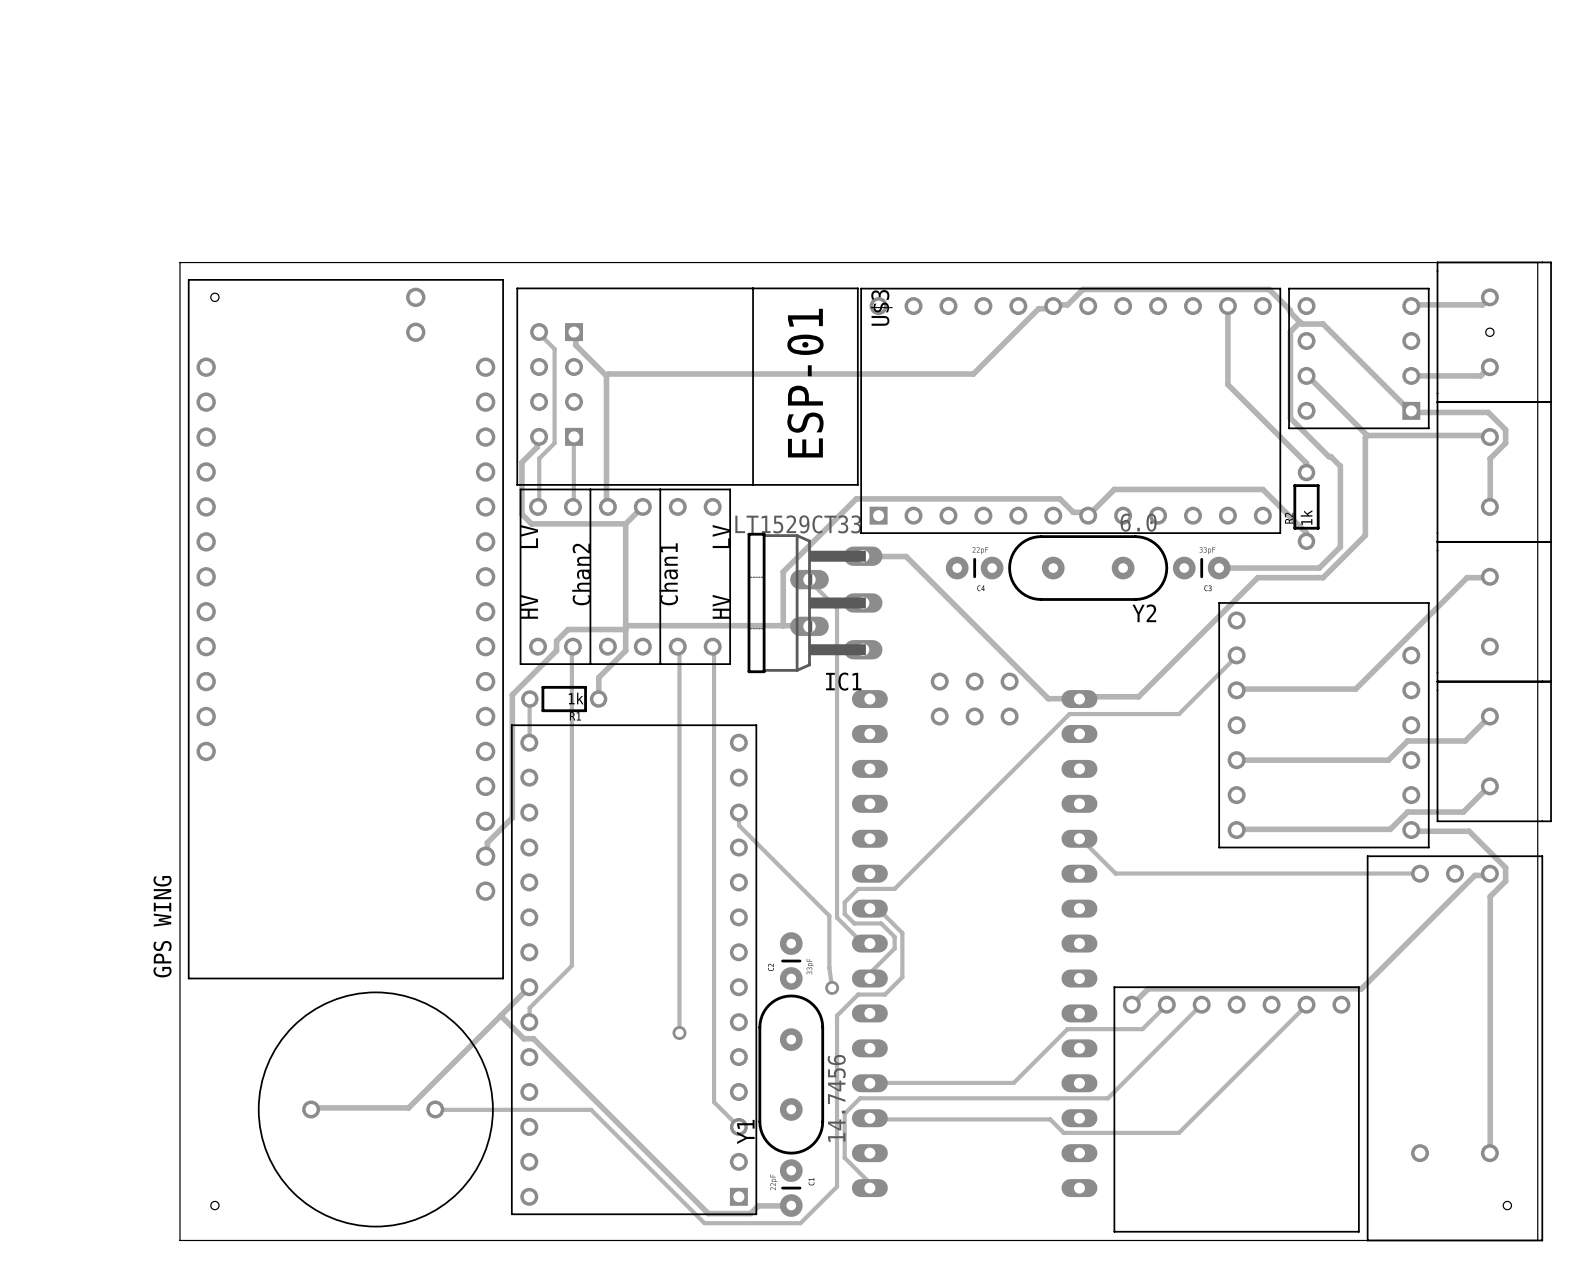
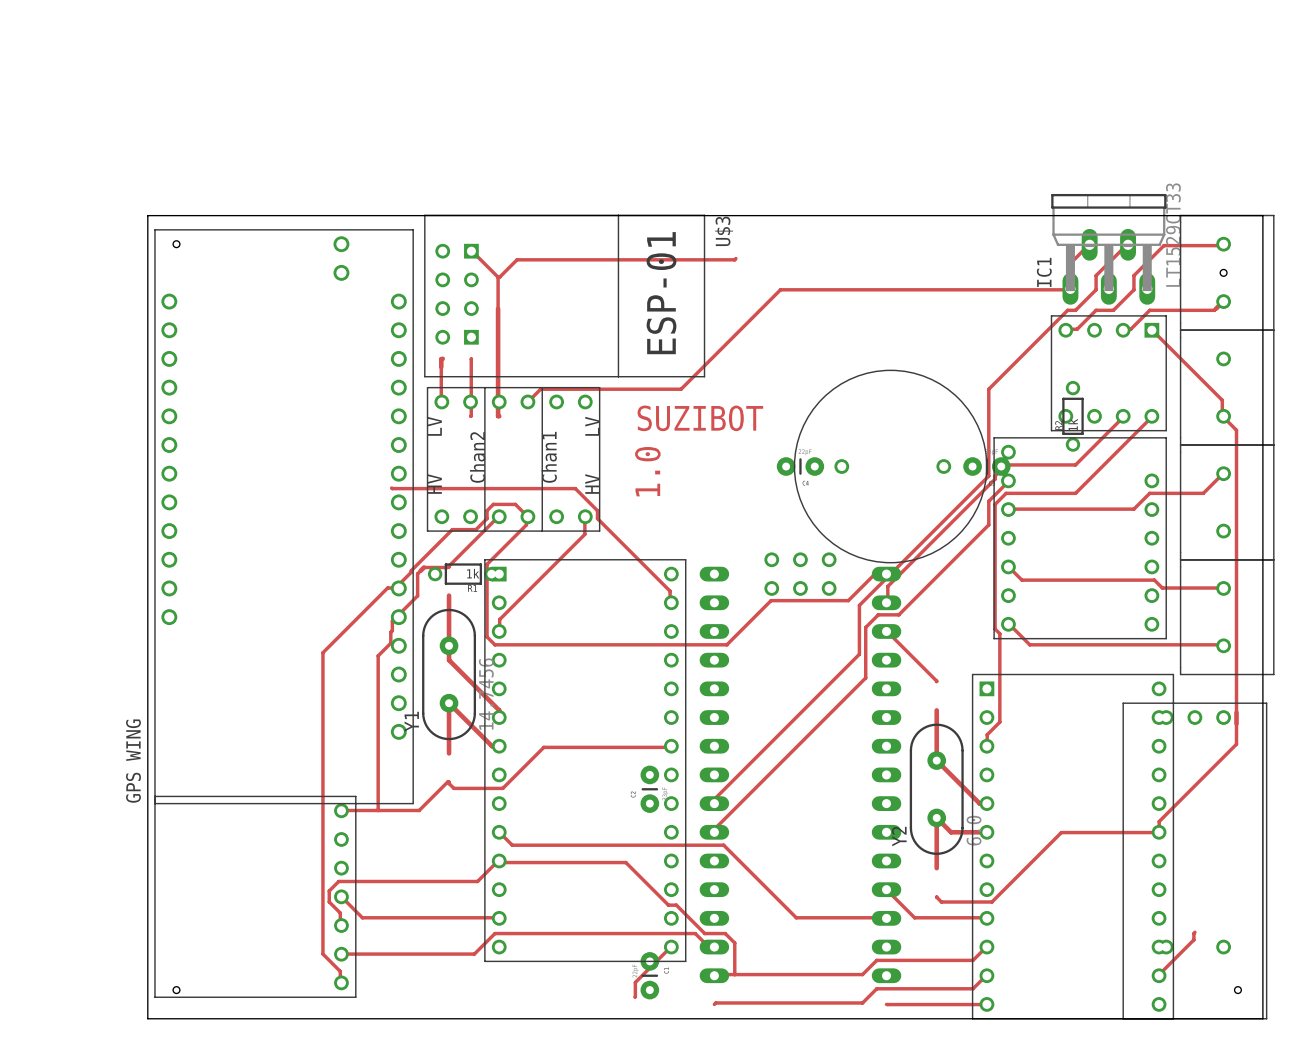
track: none -> (1089, 244) (1070, 262) (1069, 289) (780, 289) (681, 389) (540, 389) (527, 401)
track: (1488, 299) (1482, 304) (1411, 306) -> (1222, 245) (1163, 245) (1133, 275) (1133, 289) (1113, 310) (1096, 310) (1077, 329) (1065, 330)
track: none -> (471, 251) (498, 277)
track: (1227, 306) (1227, 384) (1306, 463) (1306, 472) -> none
track: none -> (735, 258) (517, 259) (498, 277)
track: (1300, 322) (1290, 331) (1290, 418) (1340, 466) (1340, 546) (1319, 568) (1219, 568) -> none
track: (539, 332) (554, 349) (554, 443) (539, 458) (538, 506) -> none
track: (574, 332) (575, 333) (575, 345) (606, 375) (608, 374) (973, 374) (1038, 308) (1052, 308) (1054, 304) (1067, 304) (1082, 289) (1269, 289) (1301, 324) (1323, 324) (1409, 410) (1413, 412) (1488, 412) (1505, 429) (1505, 443) (1490, 458) (1489, 506) -> none
track: none -> (498, 277) (498, 308)
part rotation: 0° (1358, 358) -> 90° counterclockwise (1108, 373)
part position: (1358, 358) -> (1108, 373)
track: (1306, 375) (1367, 435) -> none
track: (1411, 375) (1480, 375) -> (1123, 330) (1130, 329) (1149, 310) (1214, 310) (1216, 308)
U$3 position: (687, 386) -> (564, 296)
part: (1070, 410) -> none
track: (1367, 435) (1488, 435) (1489, 437) -> none
track: (1367, 435) (1365, 437) (1365, 535) (1323, 577) (1257, 577) (1138, 696) (1048, 698) (906, 556) (863, 556) -> none
track: (537, 447) (521, 462) (521, 514) (531, 523) (625, 523) -> (441, 367) (441, 401)
track: (642, 506) (625, 523) -> none
track: none -> (1123, 416) (1075, 464) (1006, 464) (995, 475) (995, 479) (887, 586) (886, 602)
track: none -> (1151, 416) (1075, 493) (1006, 493) (995, 504) (995, 629) (999, 633) (999, 722) (987, 734) (986, 746)
text: none -> SUZIBOT (700, 418)
track: (625, 523) (625, 650) (598, 677) (598, 699) -> none
track: (1306, 541) (1306, 533) (1262, 489) (1114, 489) (1088, 515) (1086, 512) (1073, 512) (1059, 498) (856, 498) (783, 571) (783, 625) -> none
part: none -> (890, 466)
Y2 rotation: 0° (1088, 568) -> 90° clockwise (936, 789)
Y2 position: (1088, 568) -> (936, 789)
text: none -> 1.0 (647, 471)
part position: (625, 576) -> (513, 459)
track: (1488, 577) (1467, 577) (1355, 689) (1236, 690) -> (1222, 474) (1203, 493) (1149, 493) (1133, 509) (1008, 509)
track: (809, 579) (837, 608) (837, 917) (862, 942) (869, 943) -> none
track: none -> (391, 488) (575, 488) (597, 510) (597, 518) (670, 591) (671, 602)
IC1 rotation: 0° (815, 602) -> 90° clockwise (1108, 249)
IC1 position: (815, 602) -> (1108, 249)
track: (625, 625) (809, 626) -> none
track: (625, 629) (568, 629) (556, 641) (556, 650) (516, 691) -> (499, 516) (449, 566) (423, 567)
track: none -> (585, 516) (584, 534) (499, 619) (499, 631)
track: (572, 646) (571, 965) (529, 1008) (529, 1022) -> none
track: (677, 646) (679, 646) (679, 1032) -> none
track: (712, 646) (714, 1102) (738, 1126) -> none
track: (1236, 655) (1179, 714) (1069, 714) -> (1128, 244) (1096, 275) (1096, 289) (1075, 310) (1067, 310) (988, 389) (988, 475) (878, 586)
track: (512, 694) (512, 817) (487, 842) (487, 856) (485, 856) -> (420, 570) (417, 573) (417, 595) (392, 621) (390, 643) (378, 655) (378, 810)
track: none -> (876, 572) (848, 600) (771, 600) (726, 644) (494, 644) (487, 636) (487, 564) (526, 524) (527, 516) (515, 504) (493, 504) (487, 510) (487, 518) (476, 529) (452, 529) (395, 588) (387, 588) (322, 652) (322, 954) (340, 971) (341, 982)
track: (529, 699) (529, 742) -> none
track: (1489, 716) (1465, 740) (1407, 740) (1388, 760) (1236, 760) -> (1223, 588) (1162, 588) (1154, 580) (1021, 580) (1008, 566)
track: none -> (449, 595) (449, 660) (499, 710) (499, 717)
part position: (1323, 725) -> (1080, 538)
track: (1046, 737) (894, 888) (858, 888) (844, 902) (844, 913) (854, 923) (881, 923) (894, 936) (894, 948) -> (859, 605) (859, 654) (734, 778)
track: none -> (886, 631) (936, 681)
track: (1489, 786) (1463, 812) (1407, 812) (1390, 829) (1236, 830) -> (1223, 645) (1029, 644) (1008, 624)
track: (738, 812) (739, 825) (829, 915) (829, 967) (832, 987) -> none
track: (1411, 830) (1469, 831) (1505, 867) -> (1151, 330) (1222, 400) (1222, 416) (1236, 430) (1236, 712)
track: (1079, 838) (1115, 873) (1420, 873) -> none
track: none -> (936, 710) (936, 760) (979, 803) (986, 803)
track: (1489, 873) (1488, 875) (1474, 875) (1361, 988) (1148, 988) (1131, 1004) -> none
track: (1505, 881) (1490, 896) (1489, 1153) -> (1236, 723) (1236, 744) (1159, 821) (1159, 832) (1061, 832) (991, 902) (941, 902) (936, 896)
track: none -> (499, 746) (492, 746) (449, 703) (449, 753)
track: none -> (671, 746) (543, 747) (502, 788) (453, 788) (447, 782) (419, 810) (341, 810)
track: (869, 908) (879, 910) (902, 933) (902, 977) -> (1008, 480) (988, 501) (988, 524) (898, 614) (878, 614) (865, 627) (865, 677) (741, 802)
part rotation: 0° (634, 969) -> 180° (585, 760)
track: (529, 987) (408, 1107) (312, 1107) (311, 1109) -> none
via: (832, 987) -> none
track: (885, 994) (858, 994) (837, 1015) (837, 1186) (800, 1223) (704, 1223) (591, 1109) (435, 1109) -> (726, 816) (715, 827) (714, 832)
track: (1166, 1004) (1142, 1029) (1067, 1029) (1013, 1082) (869, 1083) -> none
track: (1201, 1004) (1107, 1098) (860, 1098) (844, 1113) (844, 1157) (869, 1182) (869, 1188) -> (986, 947) (973, 960) (876, 960) (862, 974) (714, 975)
track: (1306, 1004) (1179, 1132) (1063, 1132) (1050, 1119) (869, 1118) -> none
track: none -> (499, 832) (512, 845) (723, 845) (796, 917) (886, 918)
track: none -> (986, 832) (951, 832) (936, 817) (936, 868)
track: (500, 1015) (523, 1038) (533, 1038) (708, 1213) (750, 1213) (758, 1205) (791, 1205) -> none
part: none -> (1072, 846)
via: (679, 1032) -> none
Y1 position: (791, 1074) -> (449, 674)
track: none -> (886, 889) (914, 917) (986, 918)
part: none -> (255, 896)
track: none -> (341, 896) (362, 917) (499, 918)
part: (375, 1109) -> none
part: (1236, 1109) -> none
track: none -> (341, 925) (340, 913) (329, 902) (329, 890) (338, 881) (477, 881) (498, 860) (499, 862) (625, 862) (668, 905) (676, 905) (704, 933) (725, 933) (734, 943) (734, 974)
track: none -> (1194, 932) (1193, 939) (1159, 975)
track: none -> (671, 947) (635, 982) (635, 997)
track: none -> (714, 947) (707, 946) (695, 933) (494, 933) (474, 954) (341, 954)
track: none -> (986, 975) (973, 988) (876, 988) (862, 1002) (714, 1004)
track: none -> (886, 1004) (986, 1004)

